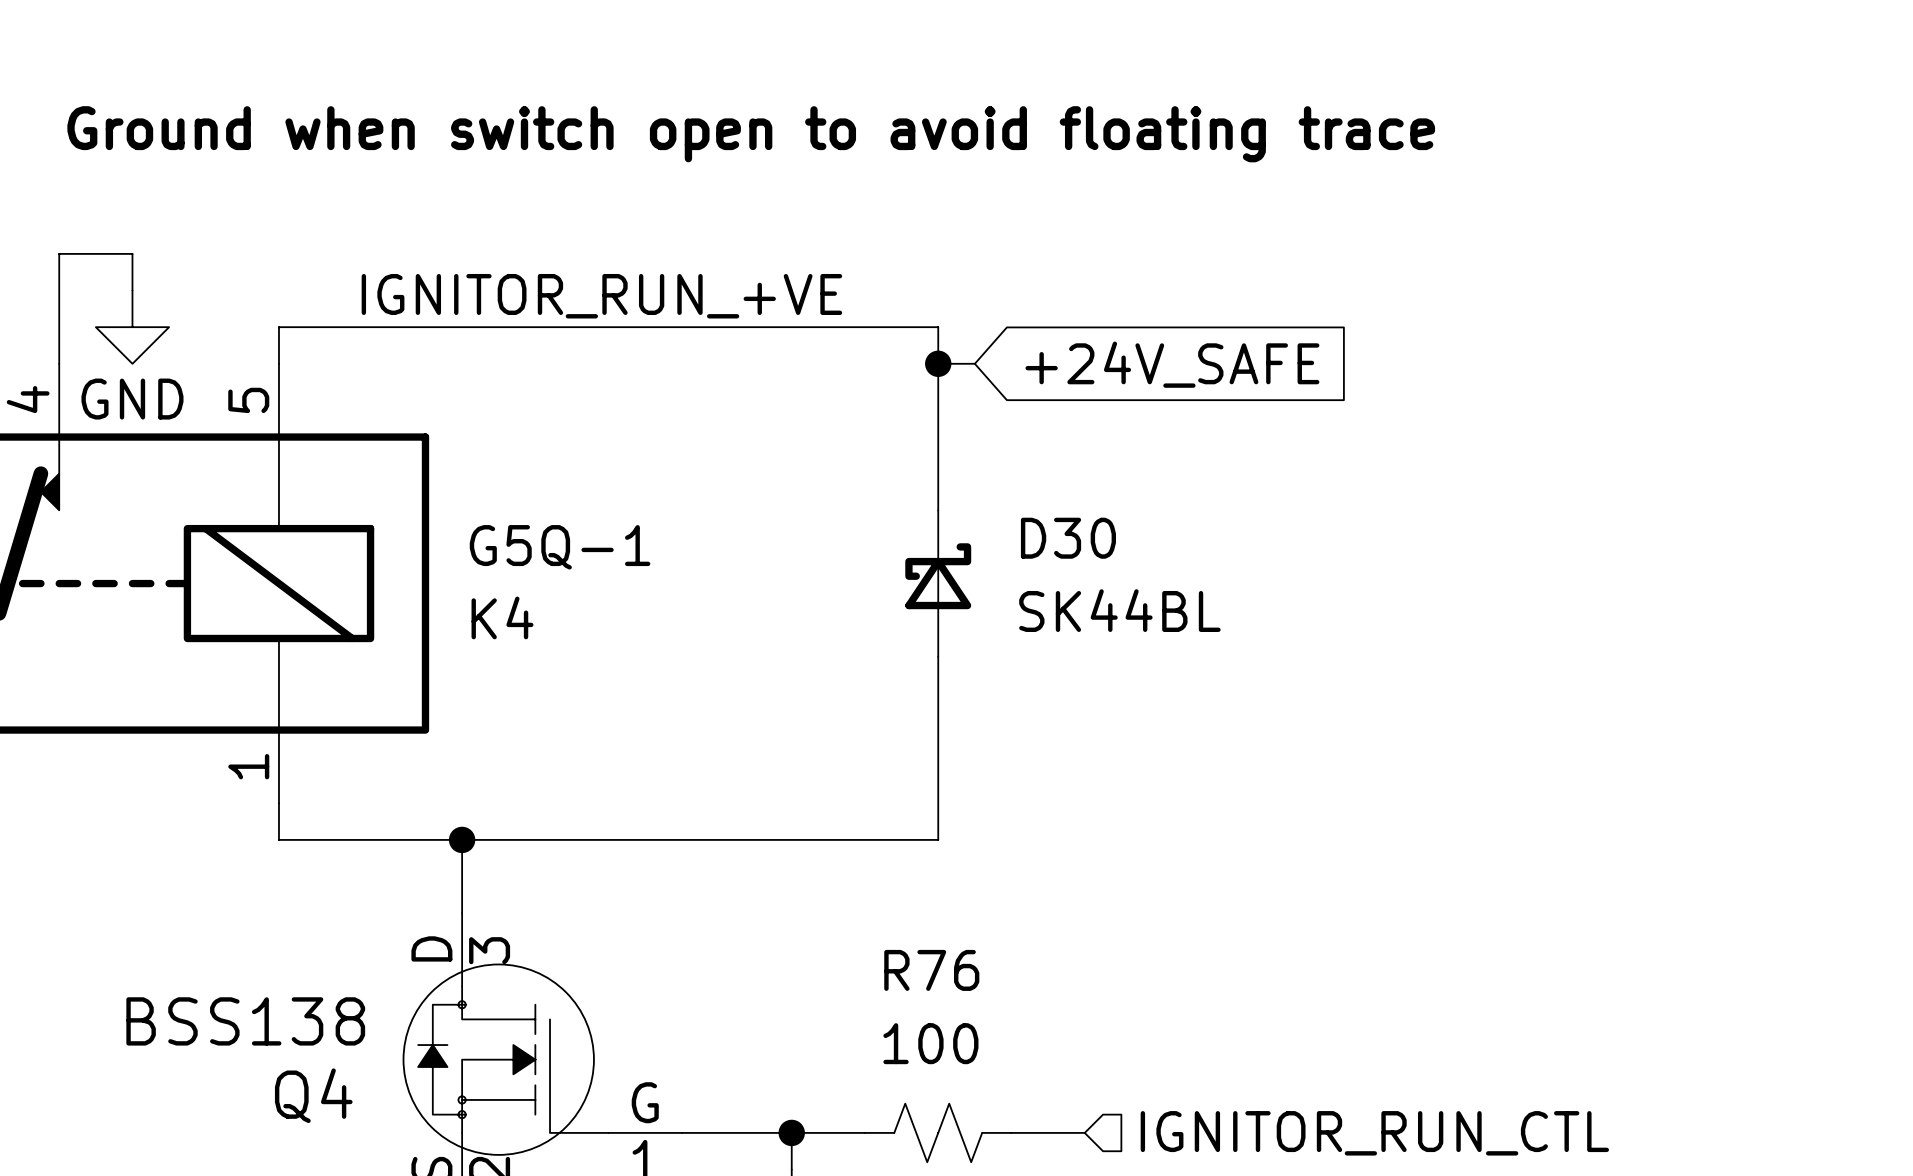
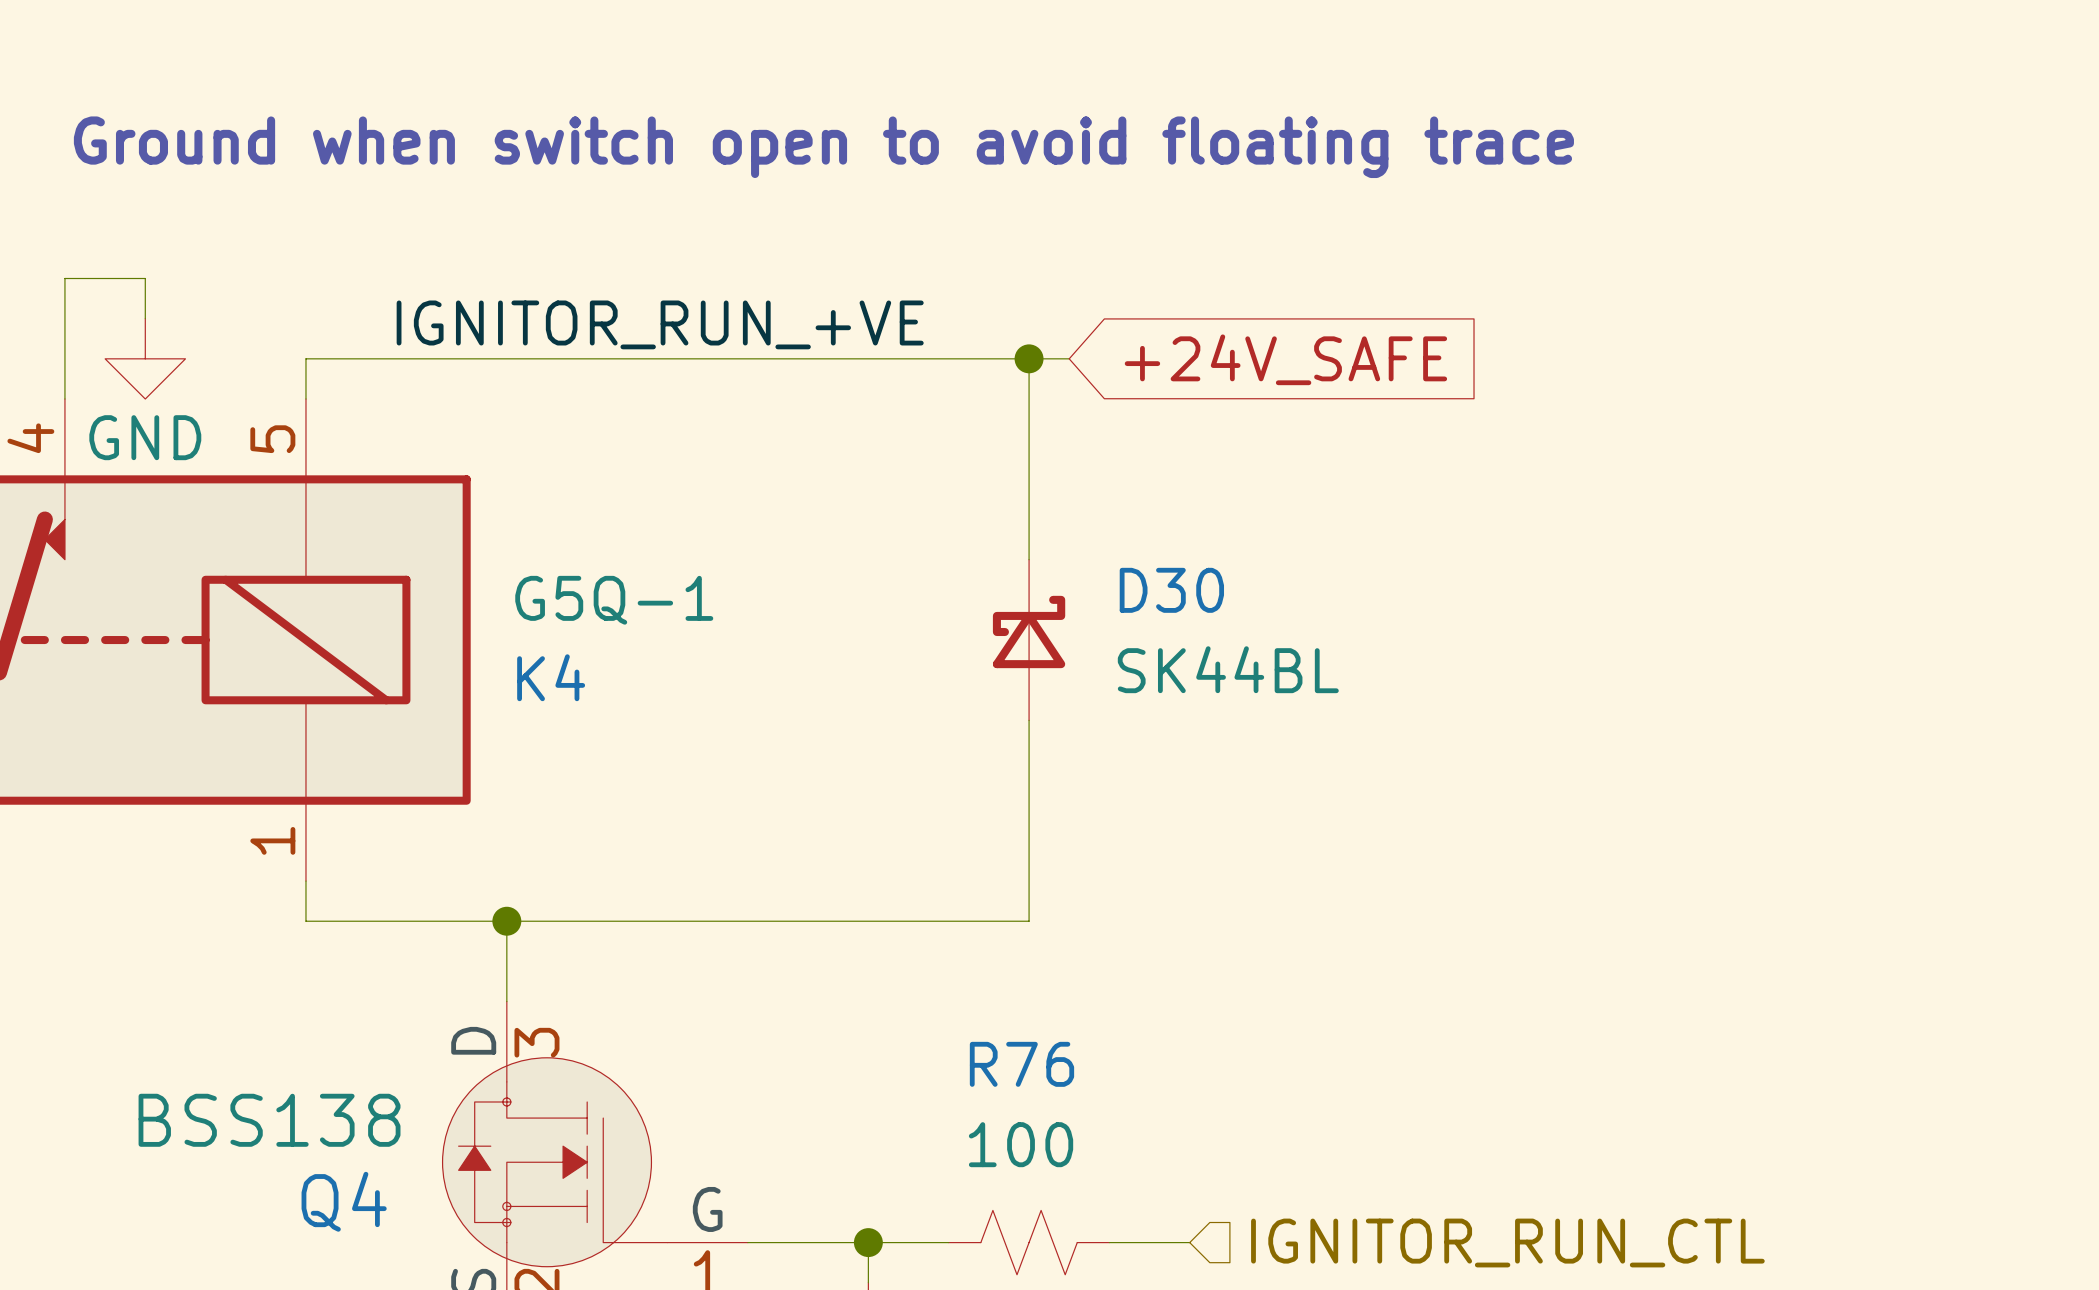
wire: (938, 363) (974, 363) -> (1029, 358) (1069, 358)
junction position: (938, 363) -> (1029, 358)
global label position: +24V_SAFE (1172, 364) -> +24V_SAFE (1285, 359)

